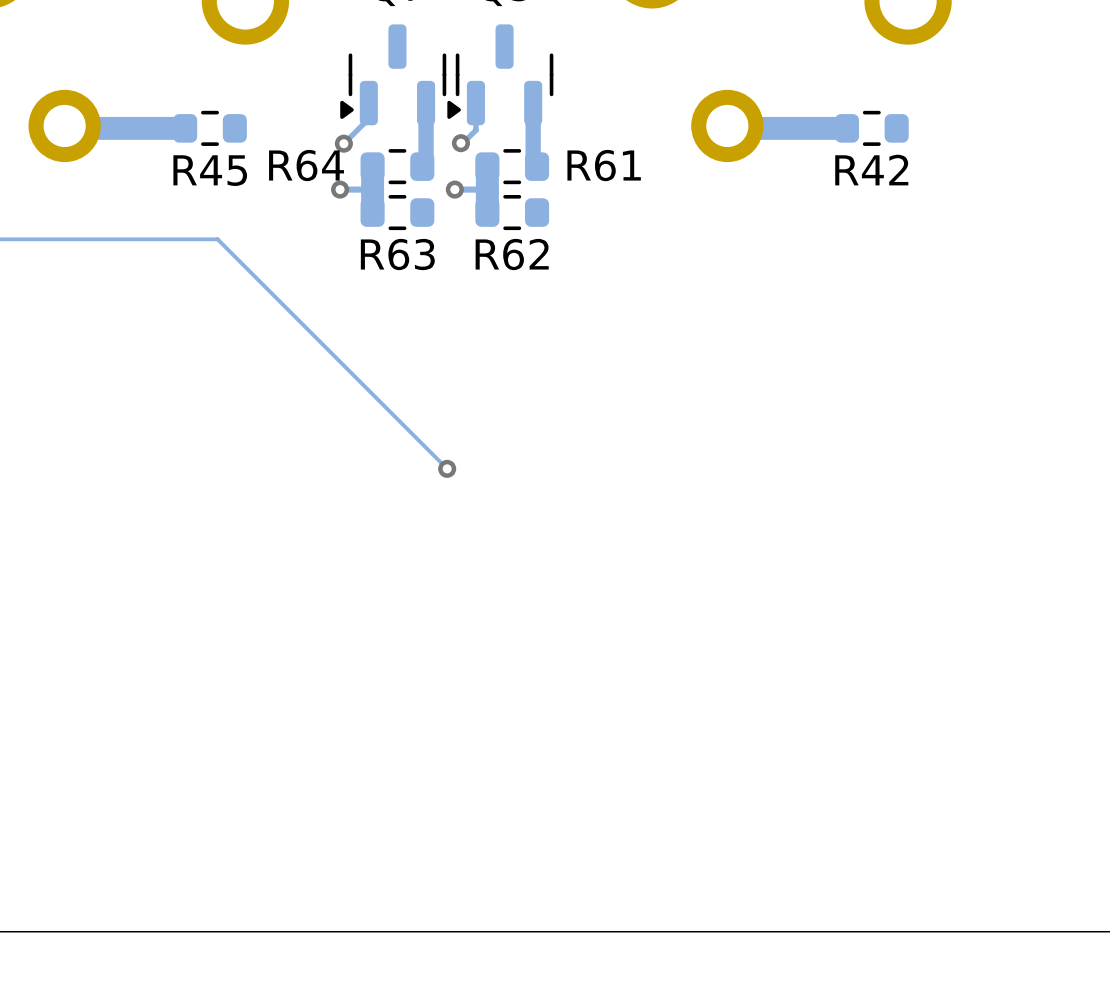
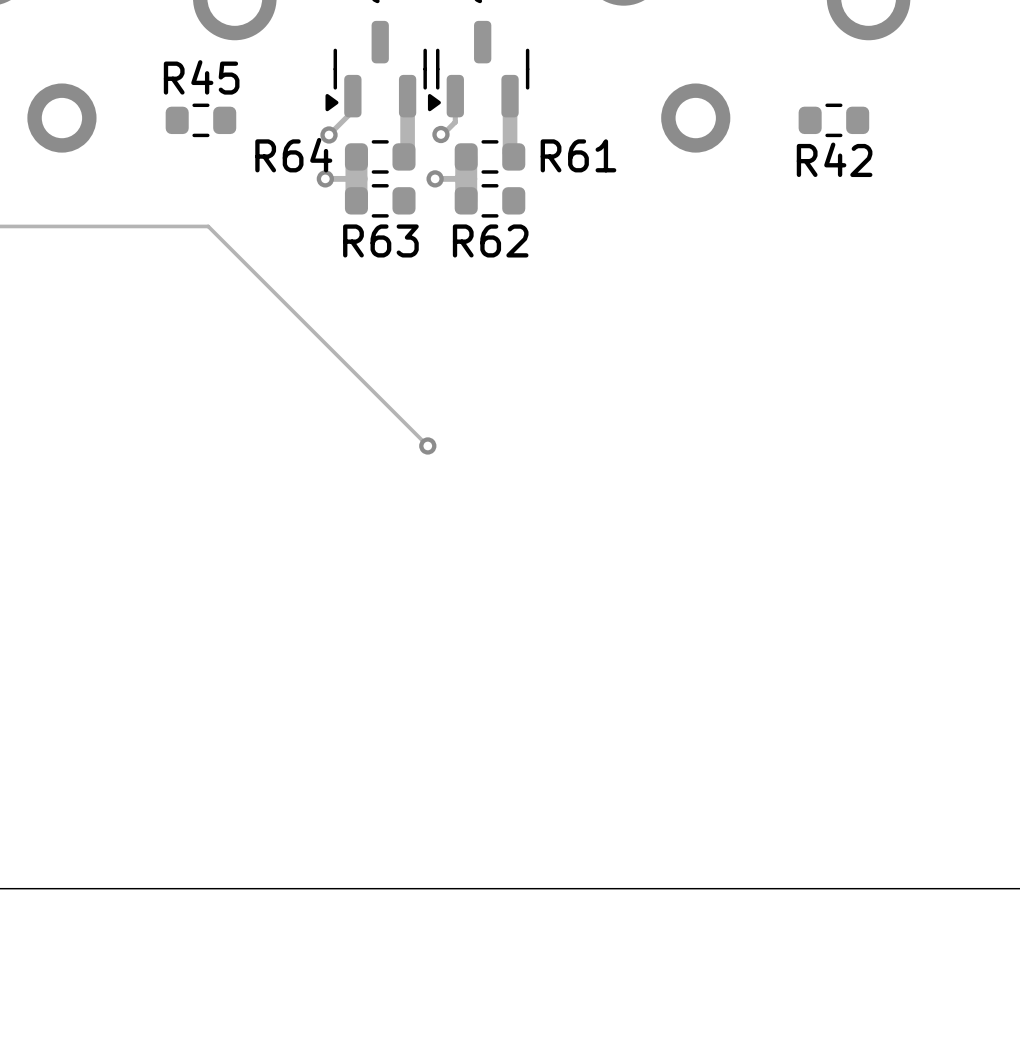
track: (64, 125) (67, 128) (185, 128) -> none
track: (727, 125) (729, 128) (846, 128) -> none
R45 name position: R45 (210, 170) -> R45 (201, 77)

